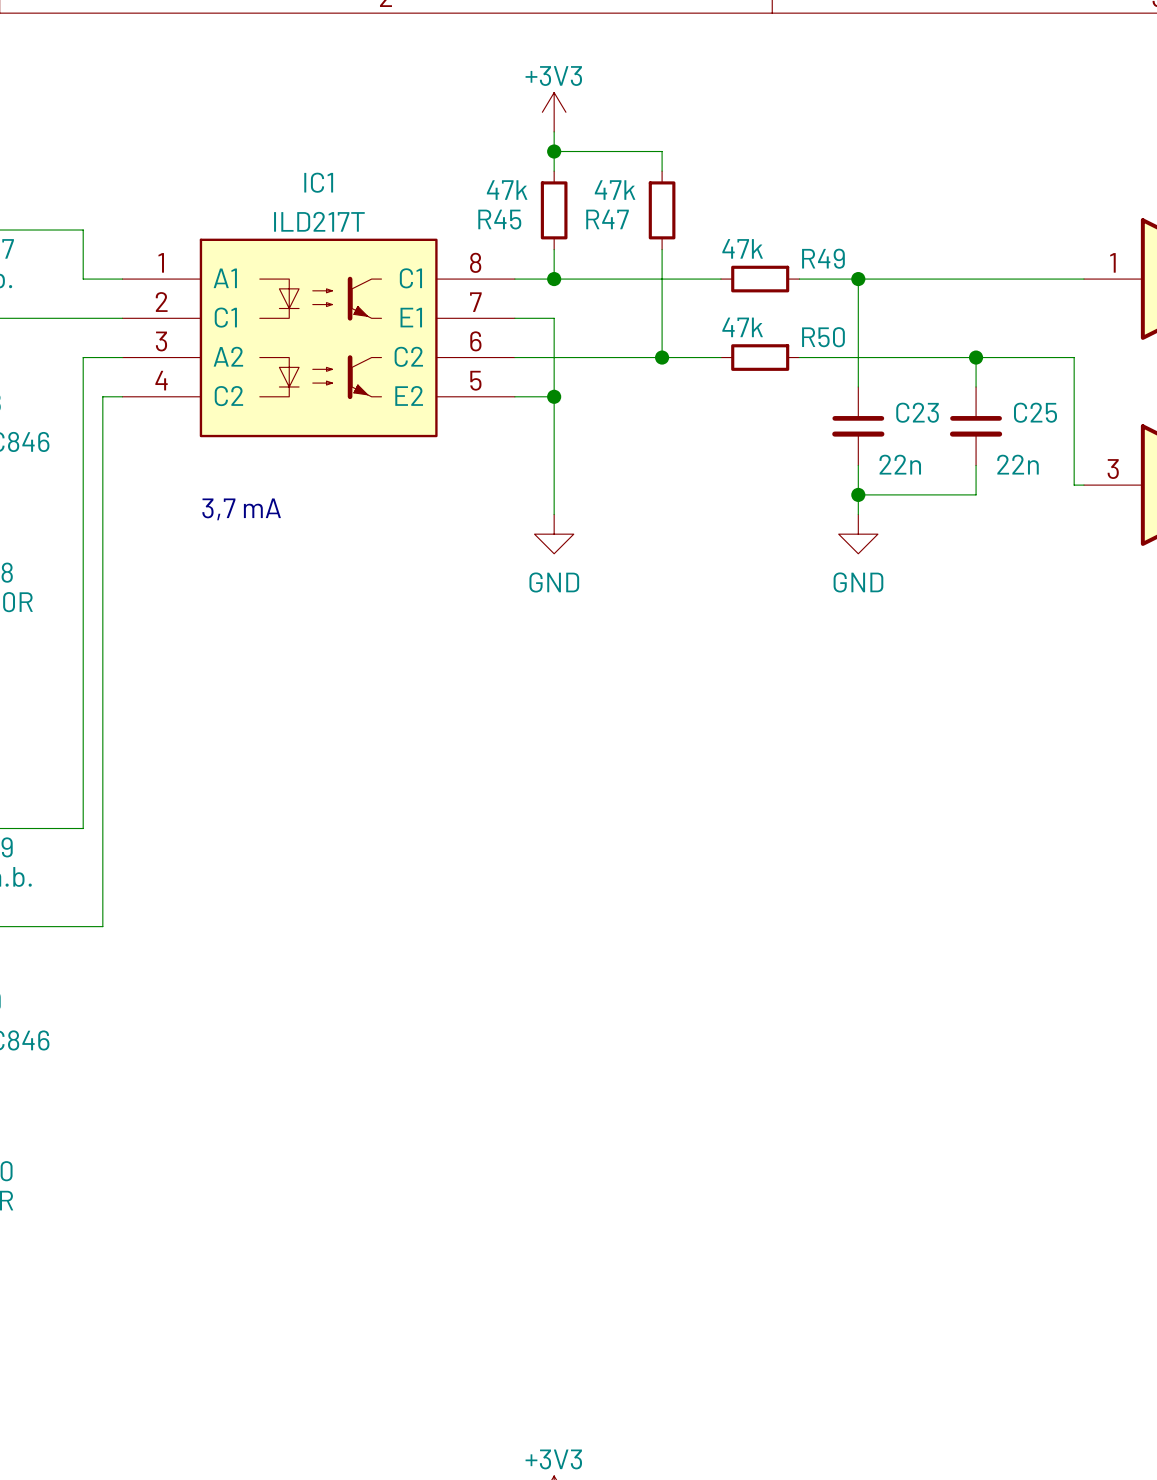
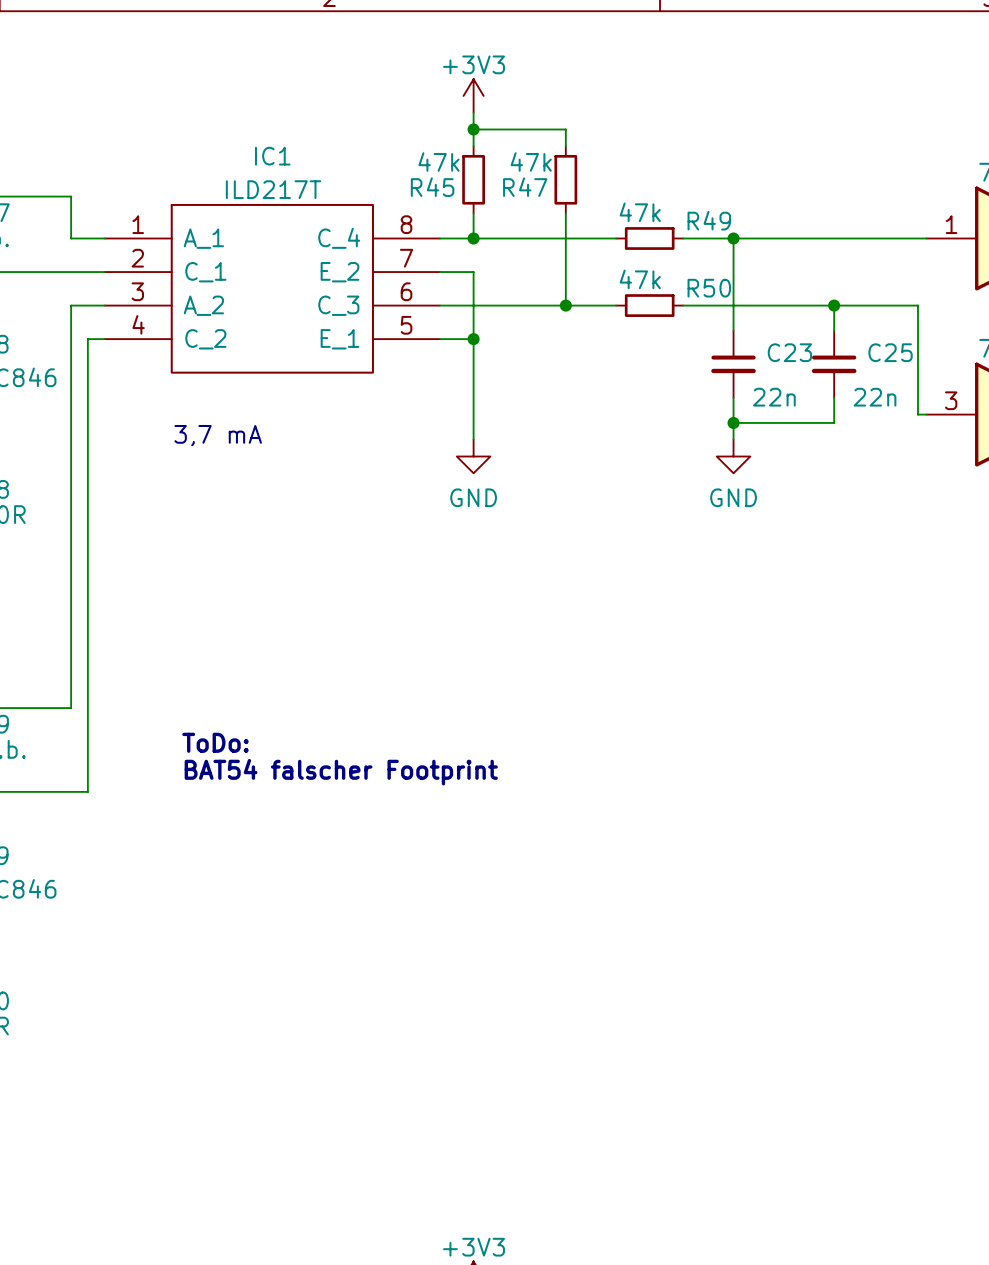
IC1 symbol: [122, 238, 515, 438] -> [104, 203, 441, 374]
text: none -> ToDo: (215, 742)
text: none -> BAT54 falscher Footprint (341, 772)

